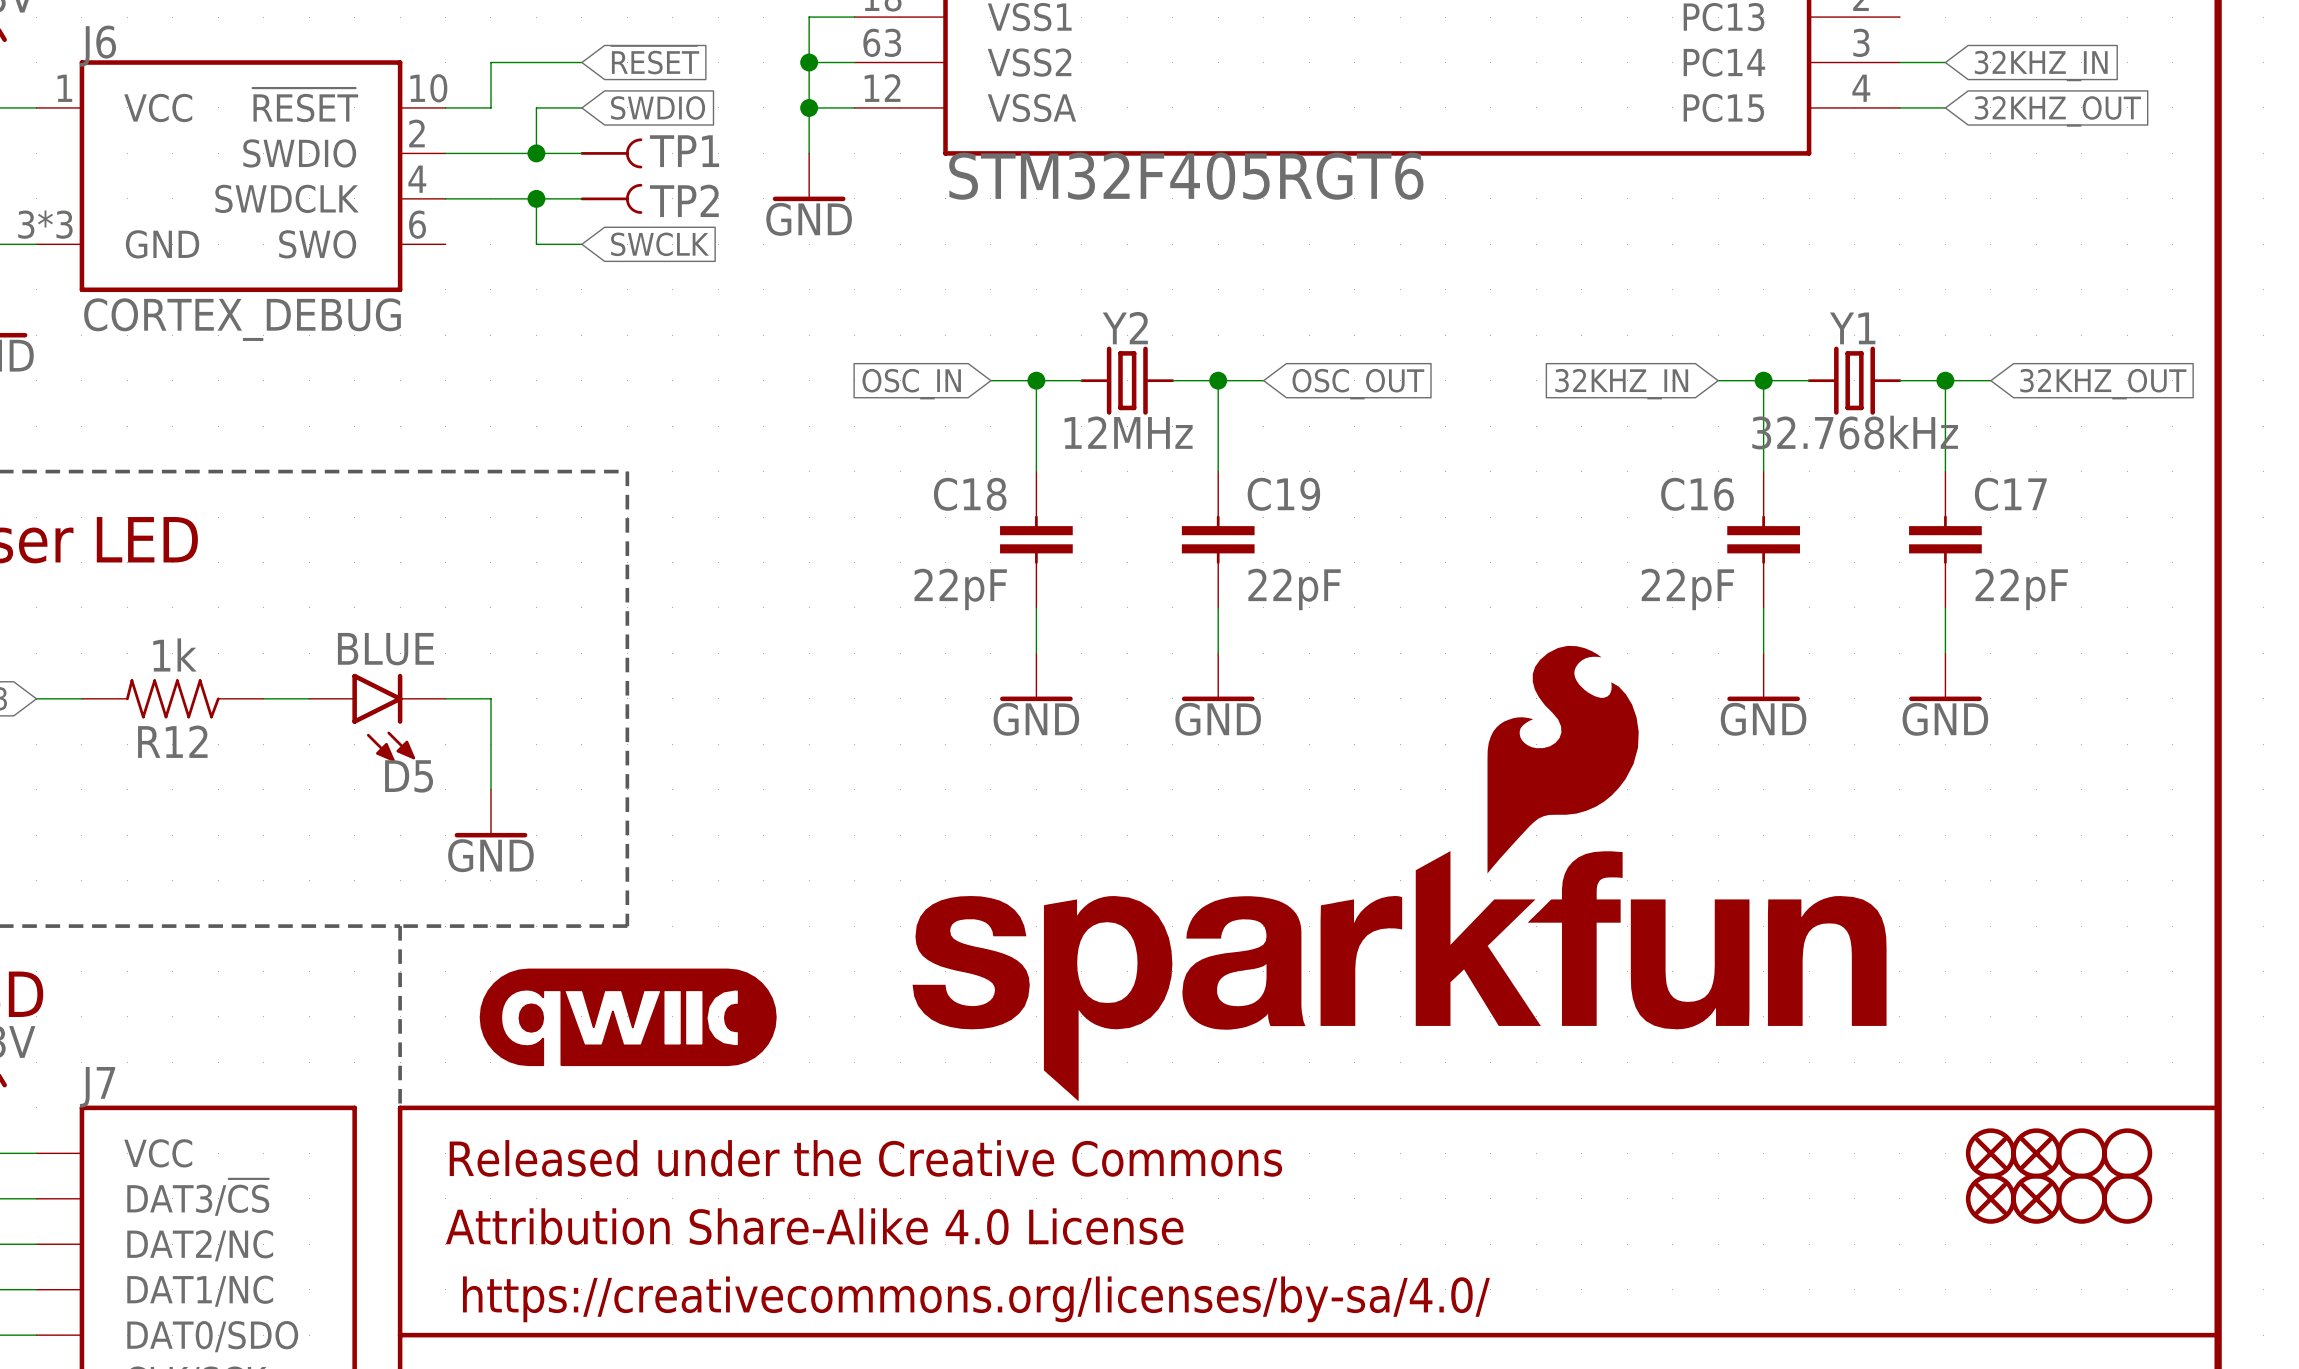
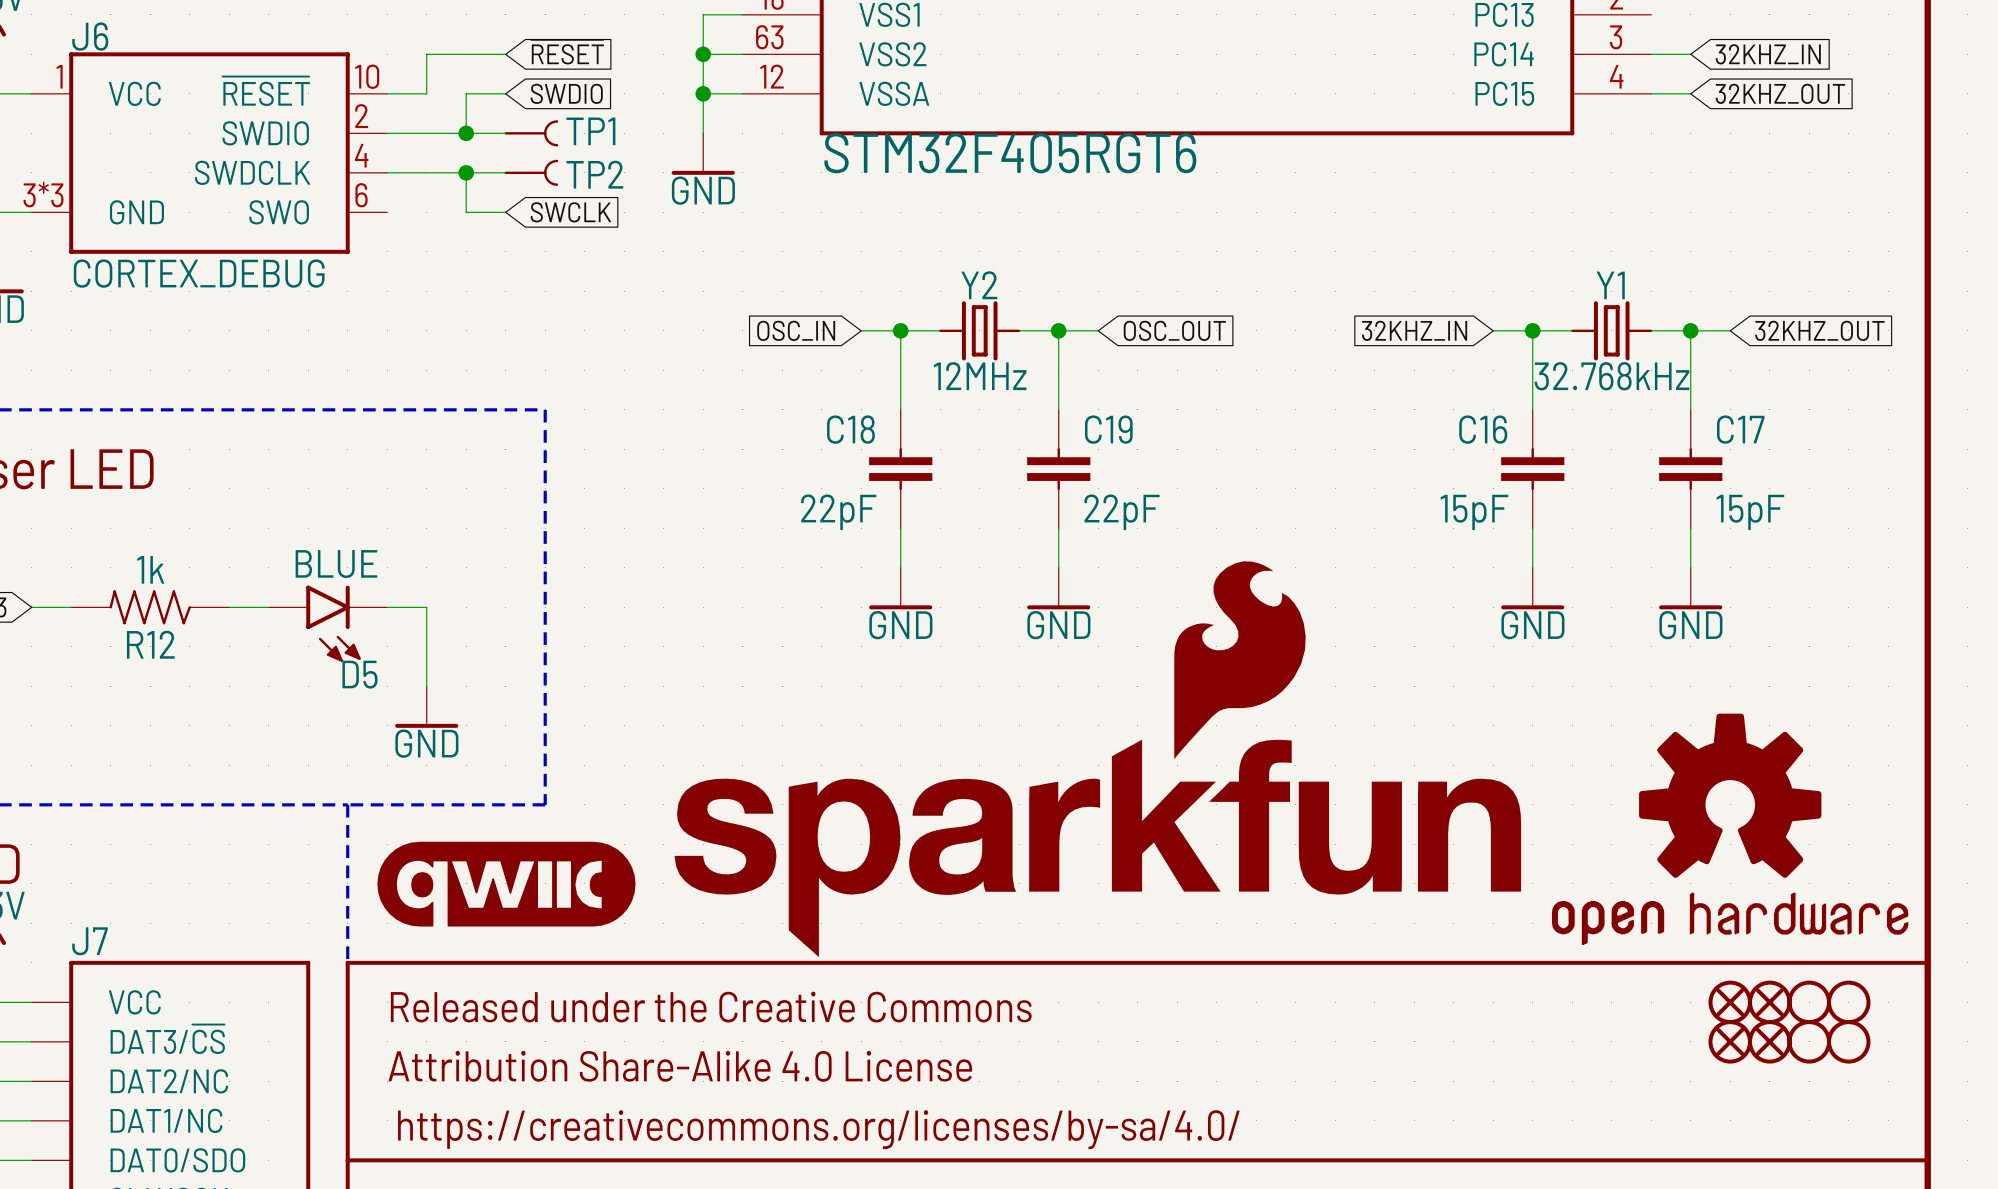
C16 value: 22pF (1687, 589) -> 15pF (1474, 512)
C17 value: 22pF (2021, 589) -> 15pF (1750, 512)
part position: (1399, 873) -> (1097, 759)
part: none -> (1730, 829)
part position: (628, 1017) -> (506, 884)

